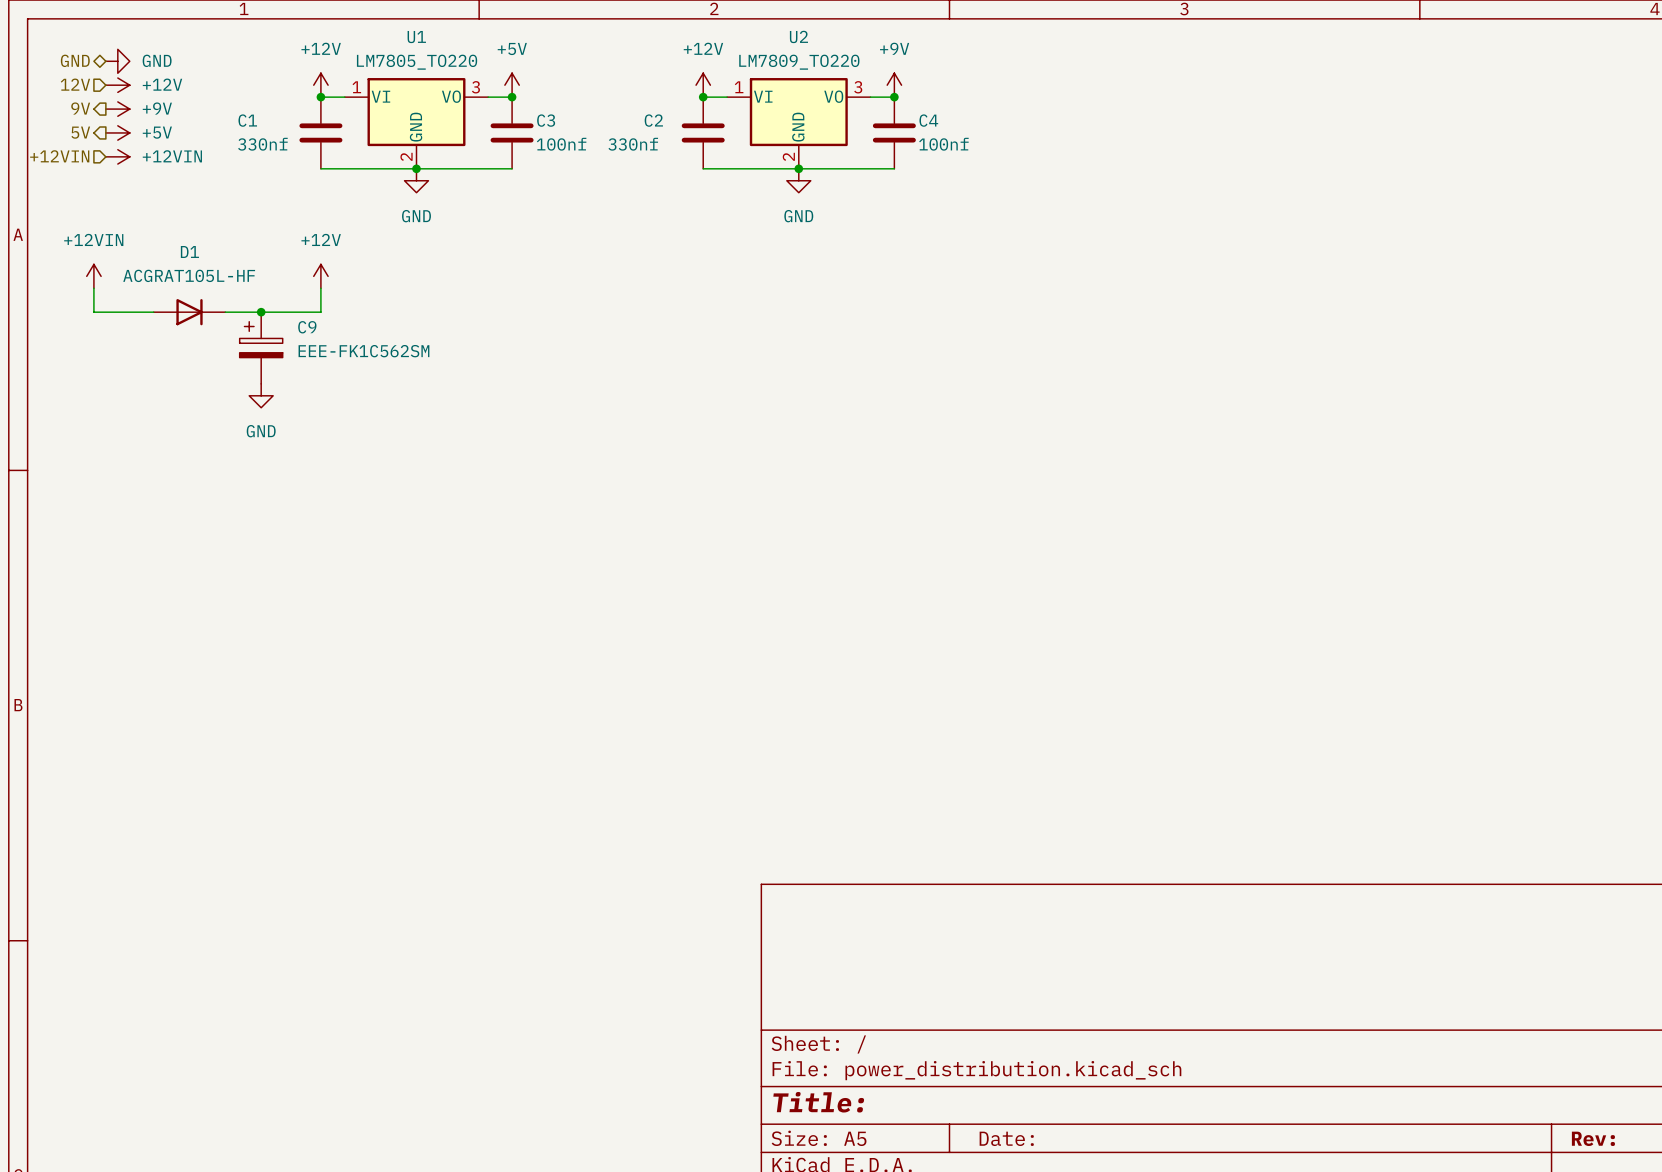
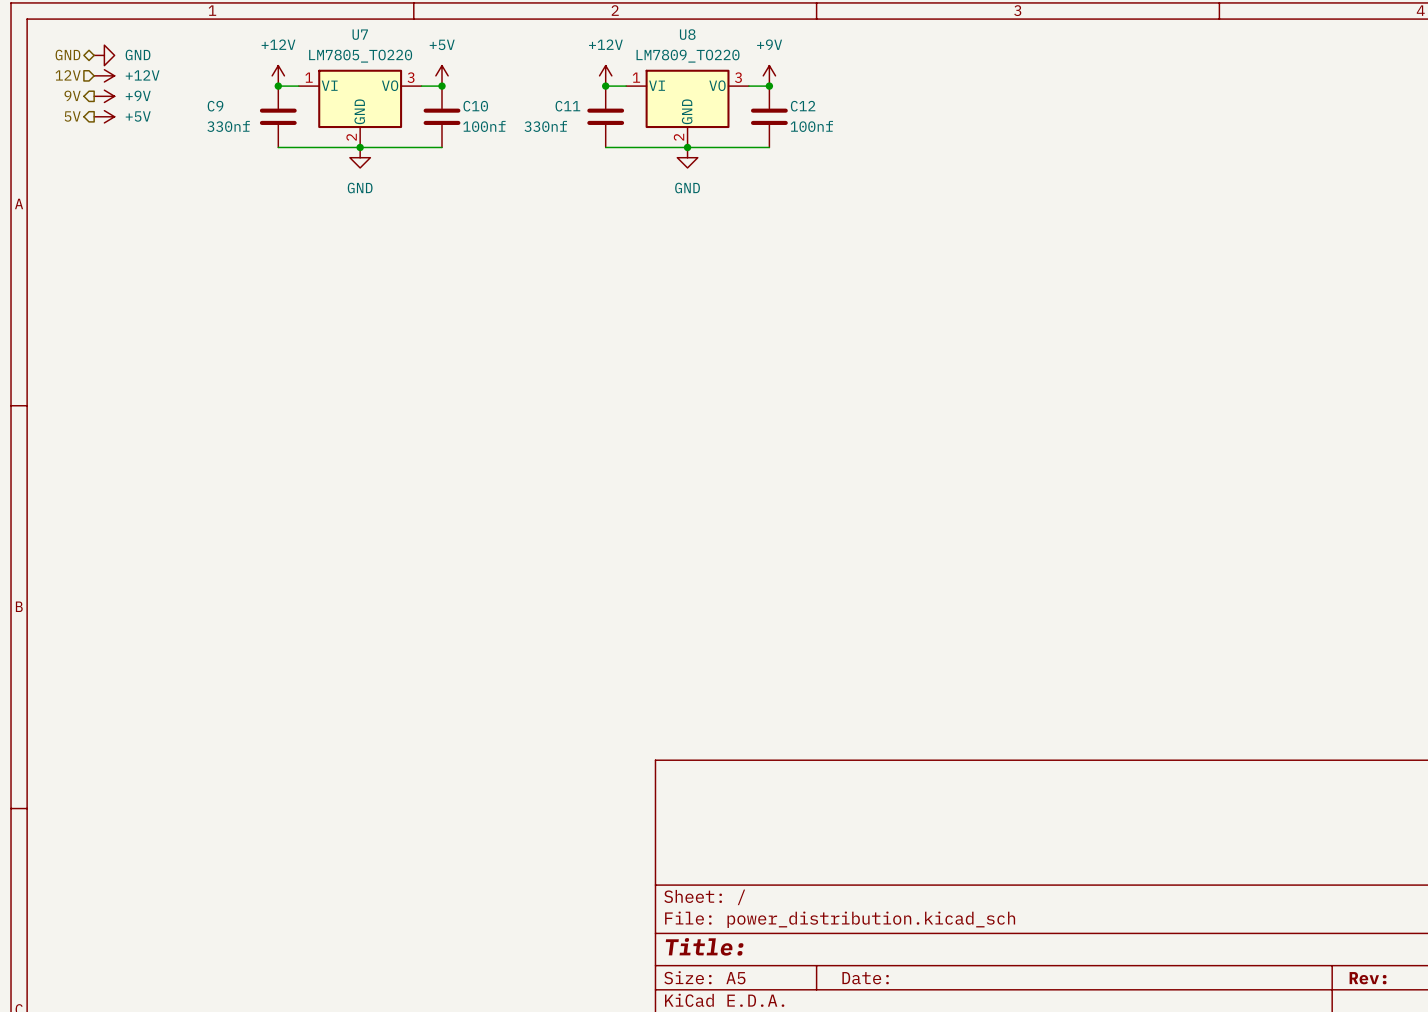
U2 name: U2 (798, 36) -> U8 (687, 34)
U1 name: U1 (416, 37) -> U7 (360, 34)
C1 name: C1 (247, 120) -> C9 (215, 106)
C3 name: C3 (546, 120) -> C10 (475, 106)
C2 name: C2 (653, 120) -> C11 (567, 106)
C4 name: C4 (928, 120) -> C12 (803, 106)
hierarchical label: +12VIN (59, 156) -> none
power symbol: +12VIN (117, 156) -> none
power symbol: +12VIN (93, 276) -> none
power symbol: +12V (320, 276) -> none
wire: (93, 288) (93, 312) (153, 312) -> none
wire: (320, 288) (320, 312) (225, 312) -> none
D1: ACGRAT105L-HF (189, 312) -> none
junction: (261, 312) -> none
C9: EEE-FK1C562SM (261, 348) -> none
power symbol: GND (261, 395) -> none

